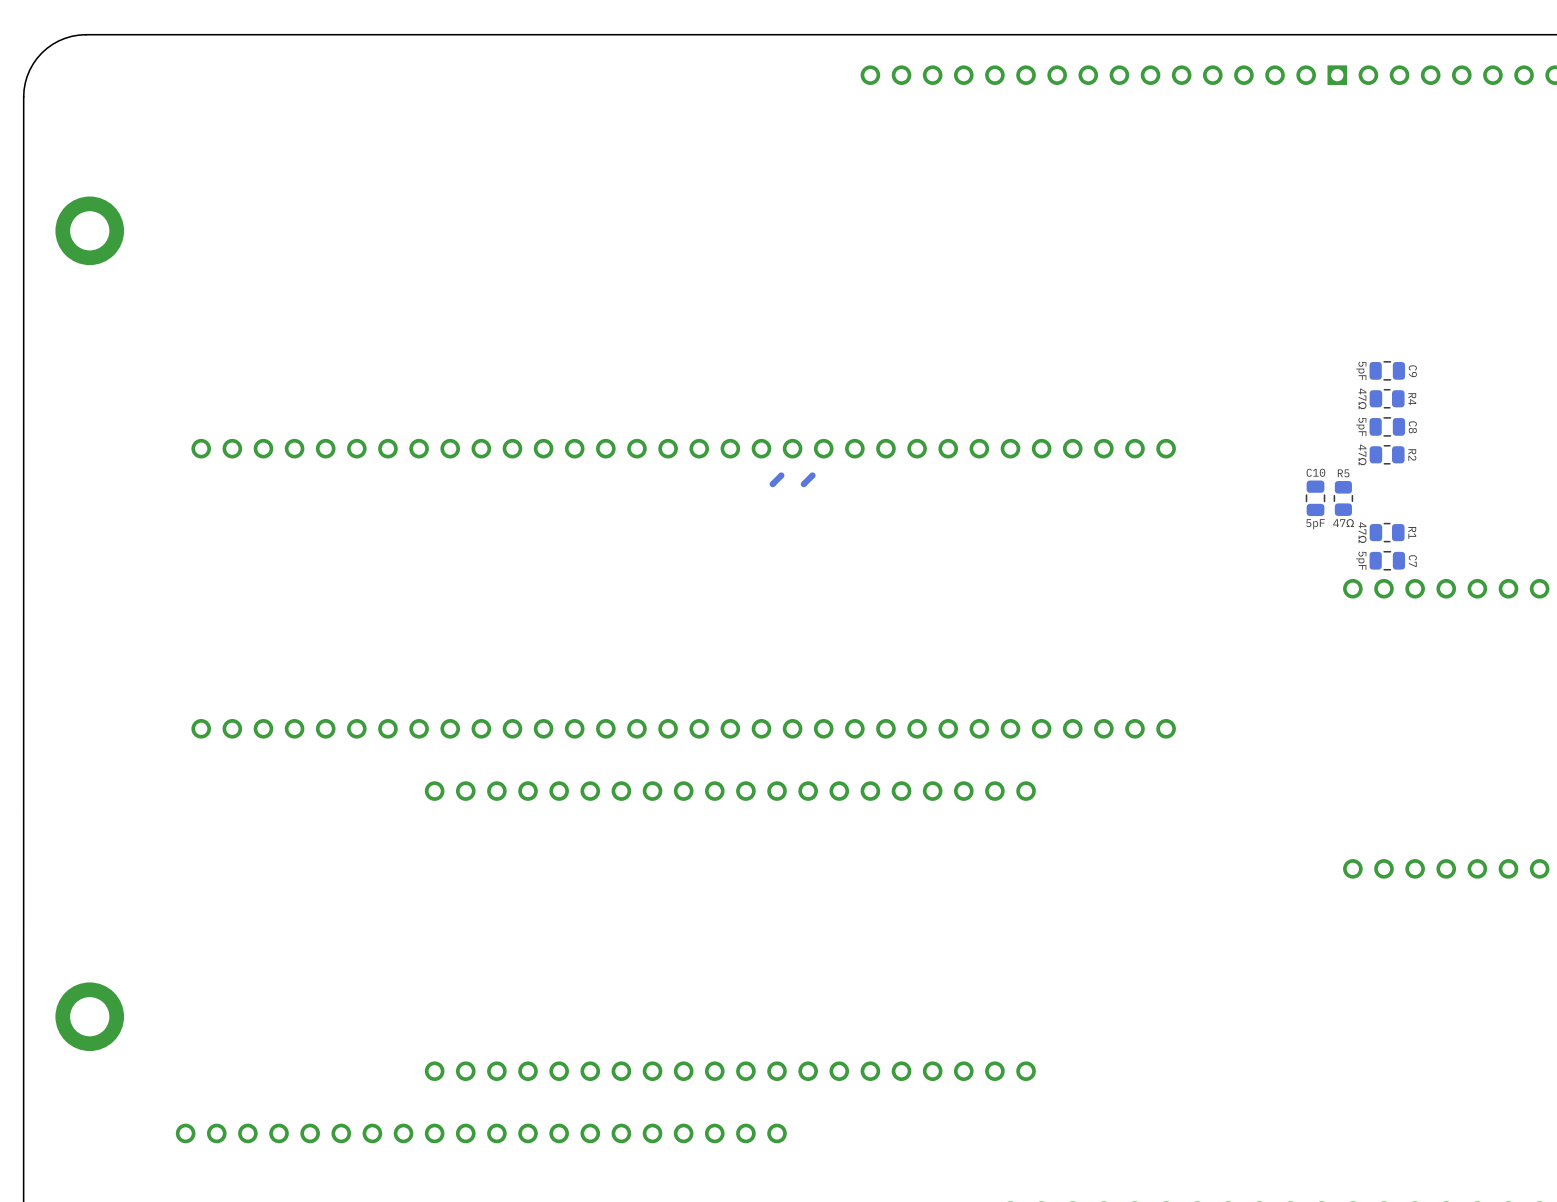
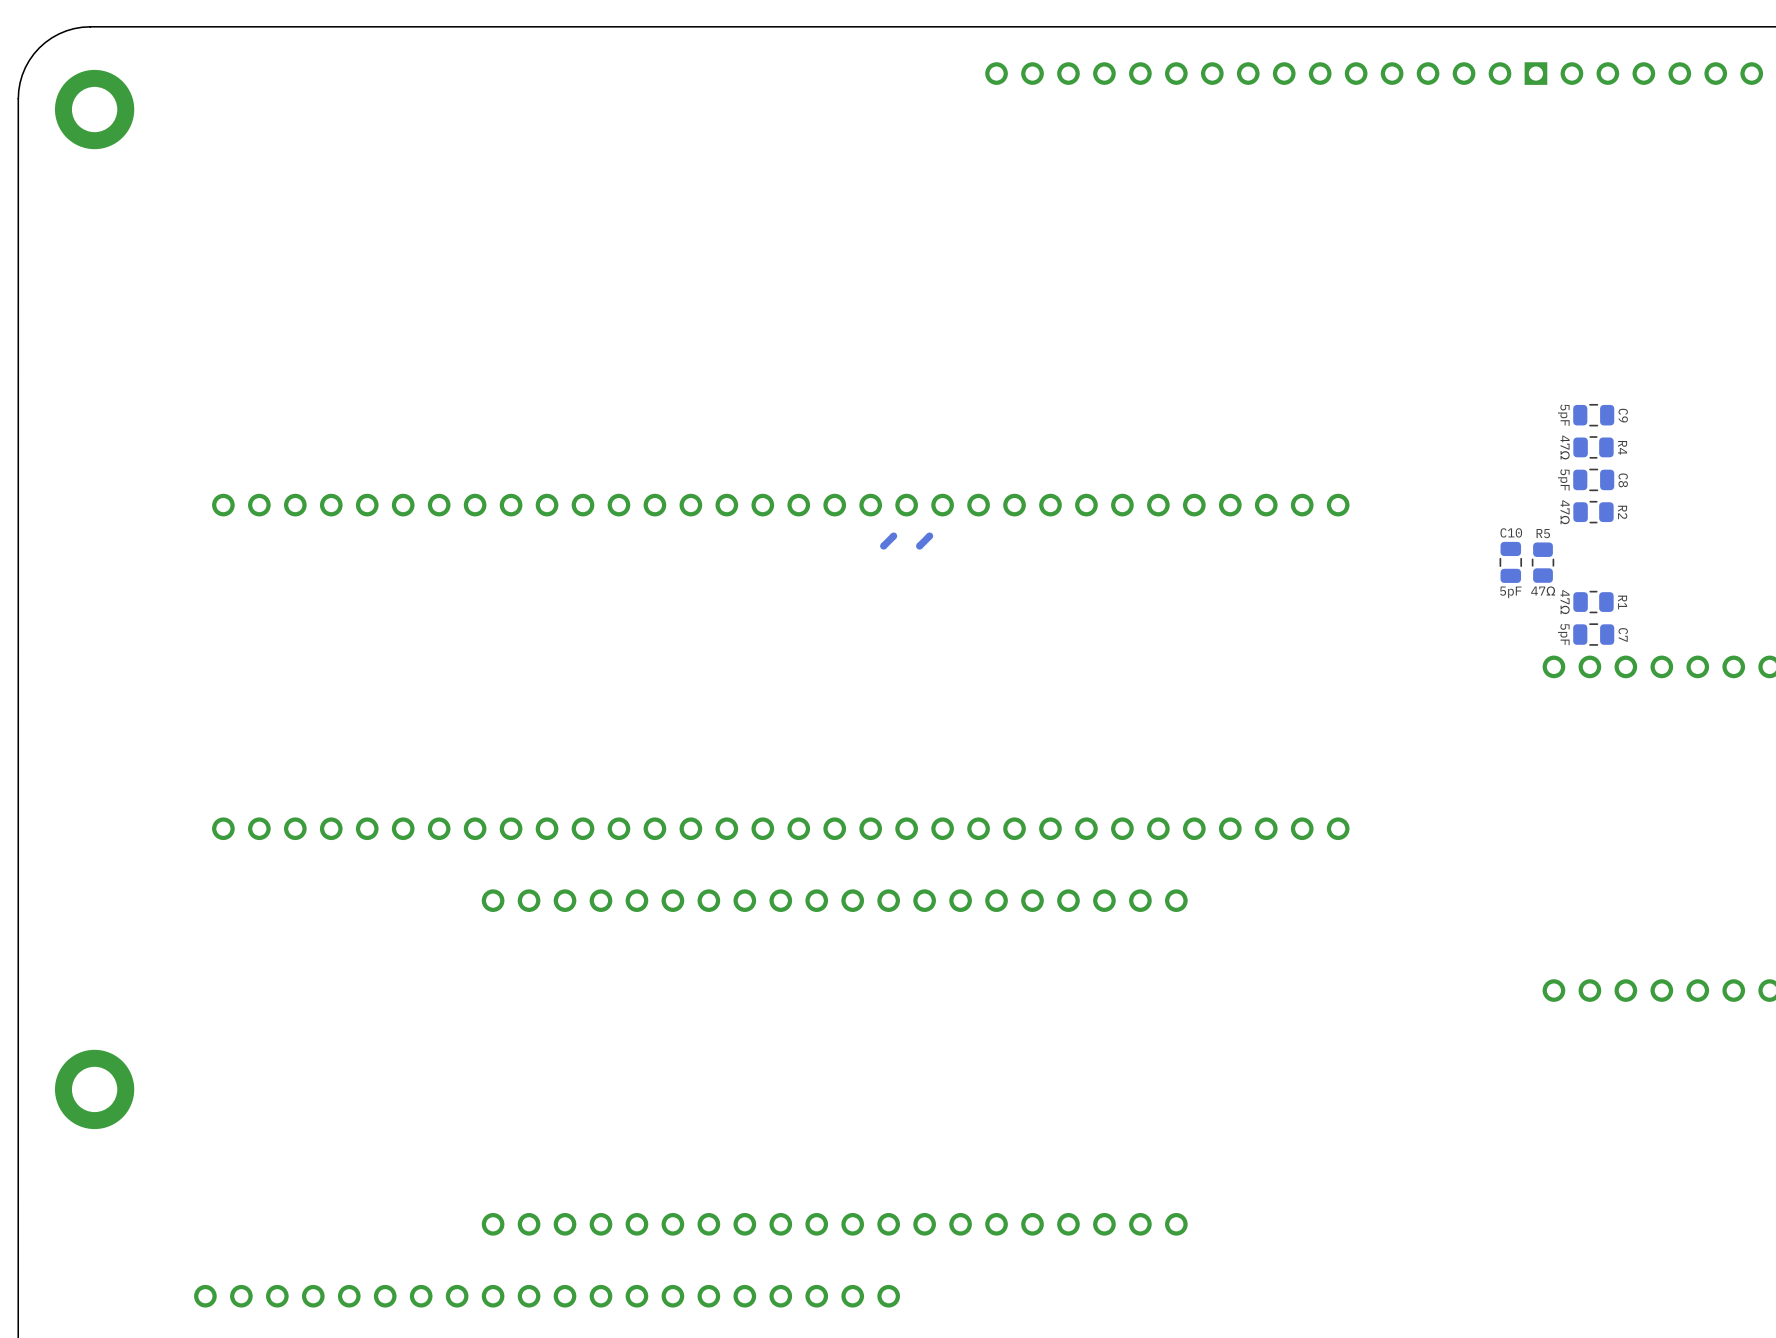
part position: (89, 230) -> (94, 109)
part position: (89, 1016) -> (94, 1089)

